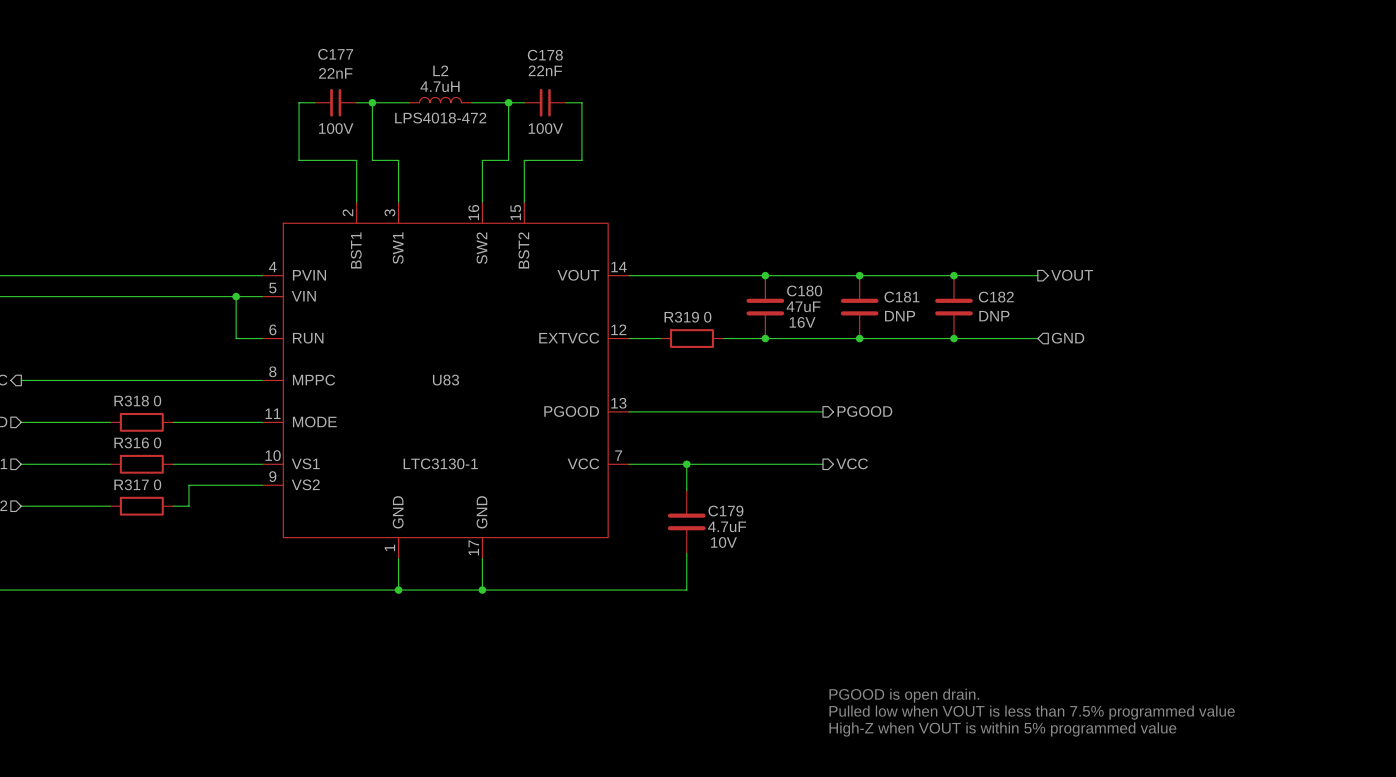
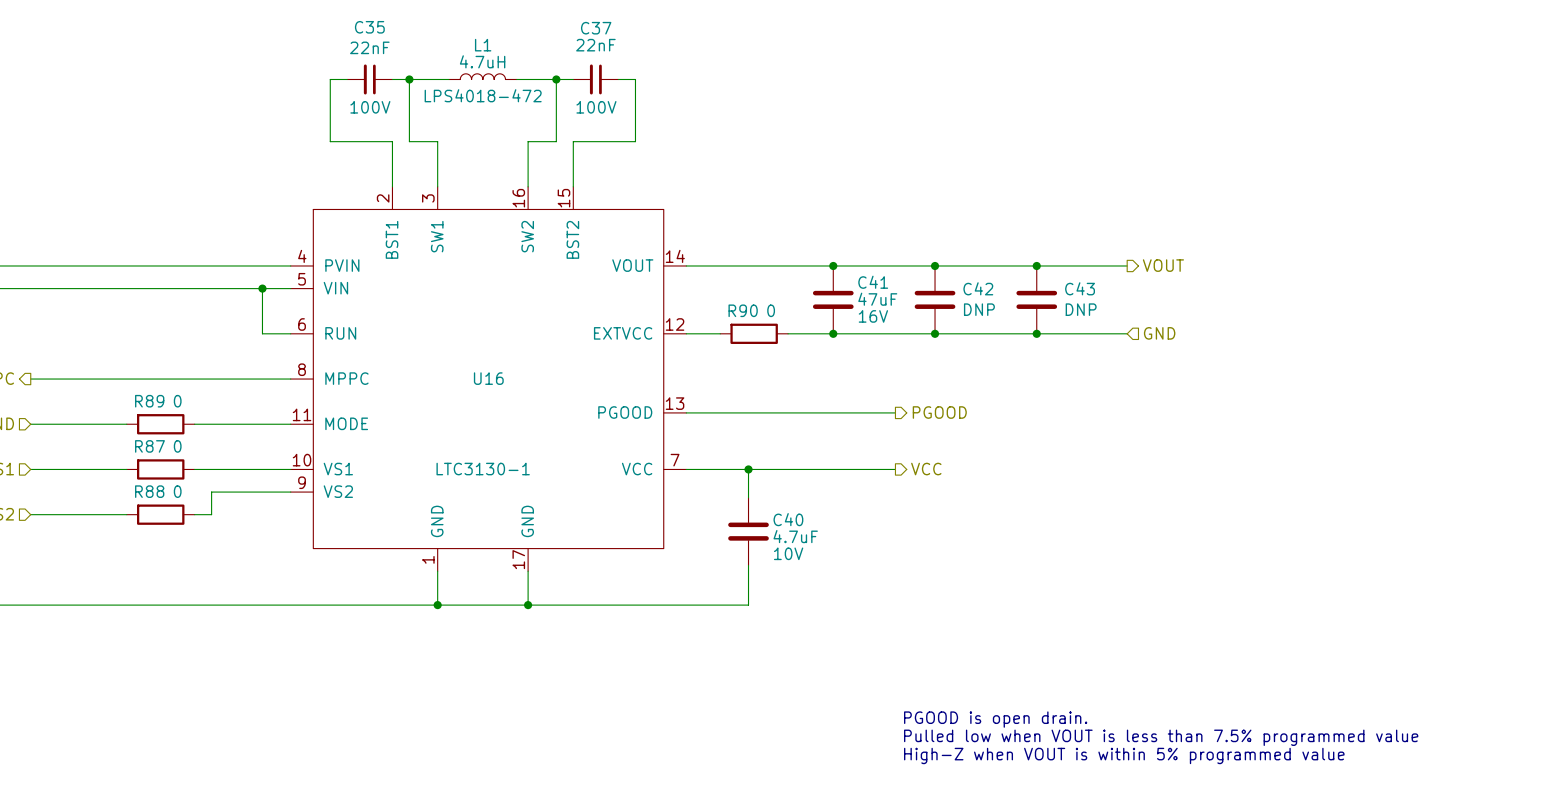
C177 name: C177 (335, 54) -> C35 (369, 27)
C178 name: C178 (545, 55) -> C37 (596, 28)
L2 name: L2 (440, 70) -> L1 (483, 45)
C180 name: C180 (804, 290) -> C41 (873, 282)
C181 name: C181 (901, 297) -> C42 (978, 288)
C182 name: C182 (996, 297) -> C43 (1080, 288)
R319 name: R319 (681, 317) -> R90 (743, 310)
U83 name: U83 (445, 380) -> U16 (488, 378)
R318 name: R318 (131, 401) -> R89 (149, 401)
R316 name: R316 (131, 442) -> R87 (149, 446)
R317 name: R317 (131, 484) -> R88 (149, 491)
C179 name: C179 (725, 511) -> C40 (788, 519)

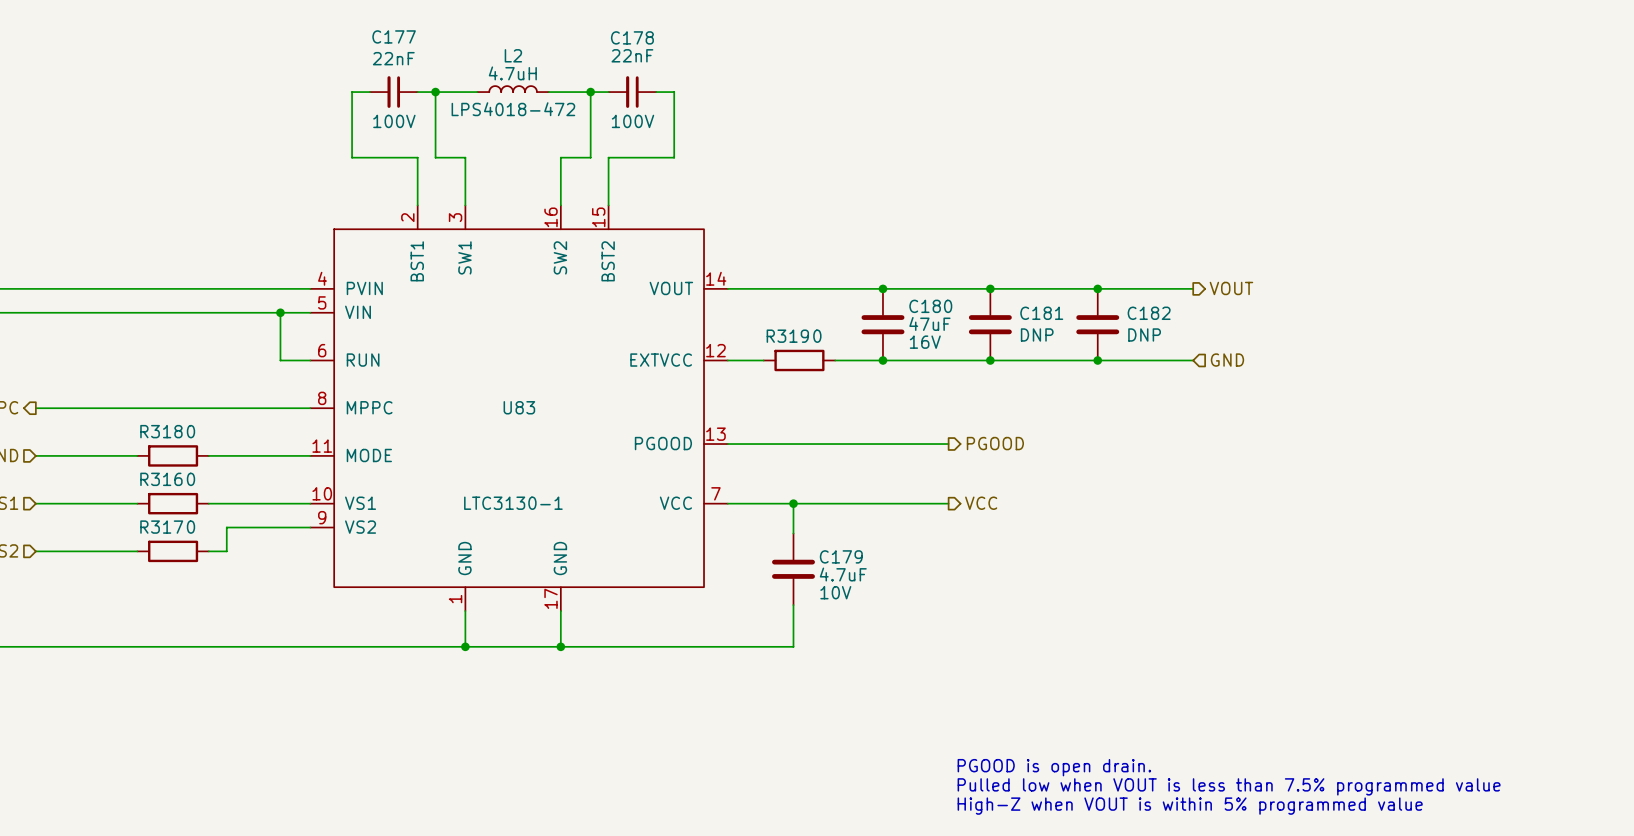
C35 name: C35 (369, 27) -> C177 (394, 36)
C37 name: C37 (596, 28) -> C178 (632, 37)
L1 name: L1 (483, 45) -> L2 (513, 55)
C41 name: C41 (873, 282) -> C180 (930, 306)
C42 name: C42 (978, 288) -> C181 (1041, 313)
C43 name: C43 (1080, 288) -> C182 (1149, 313)
R90 name: R90 (743, 310) -> R319 (787, 336)
U16 name: U16 (488, 378) -> U83 (519, 407)
R89 name: R89 (149, 401) -> R318 (161, 431)
R87 name: R87 (149, 446) -> R316 (161, 479)
R88 name: R88 (149, 491) -> R317 (161, 527)
C40 name: C40 (788, 519) -> C179 (841, 556)

